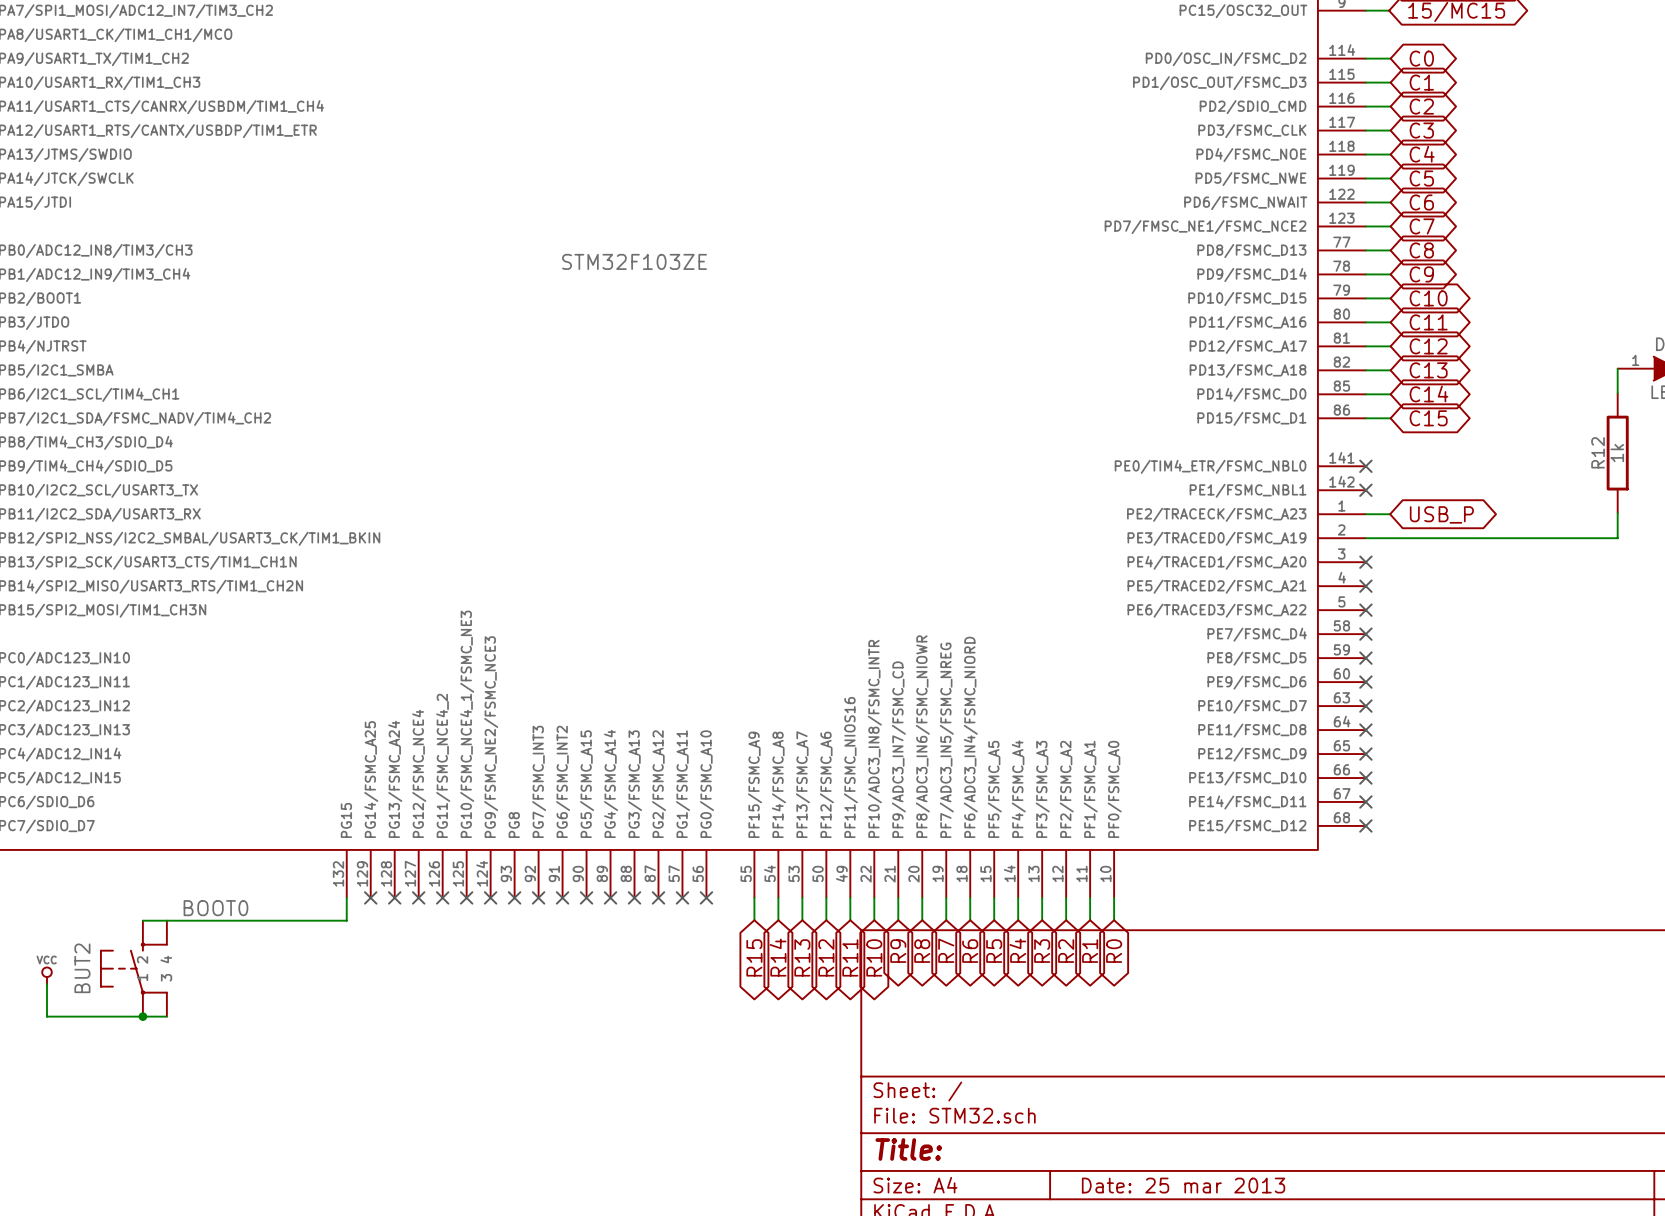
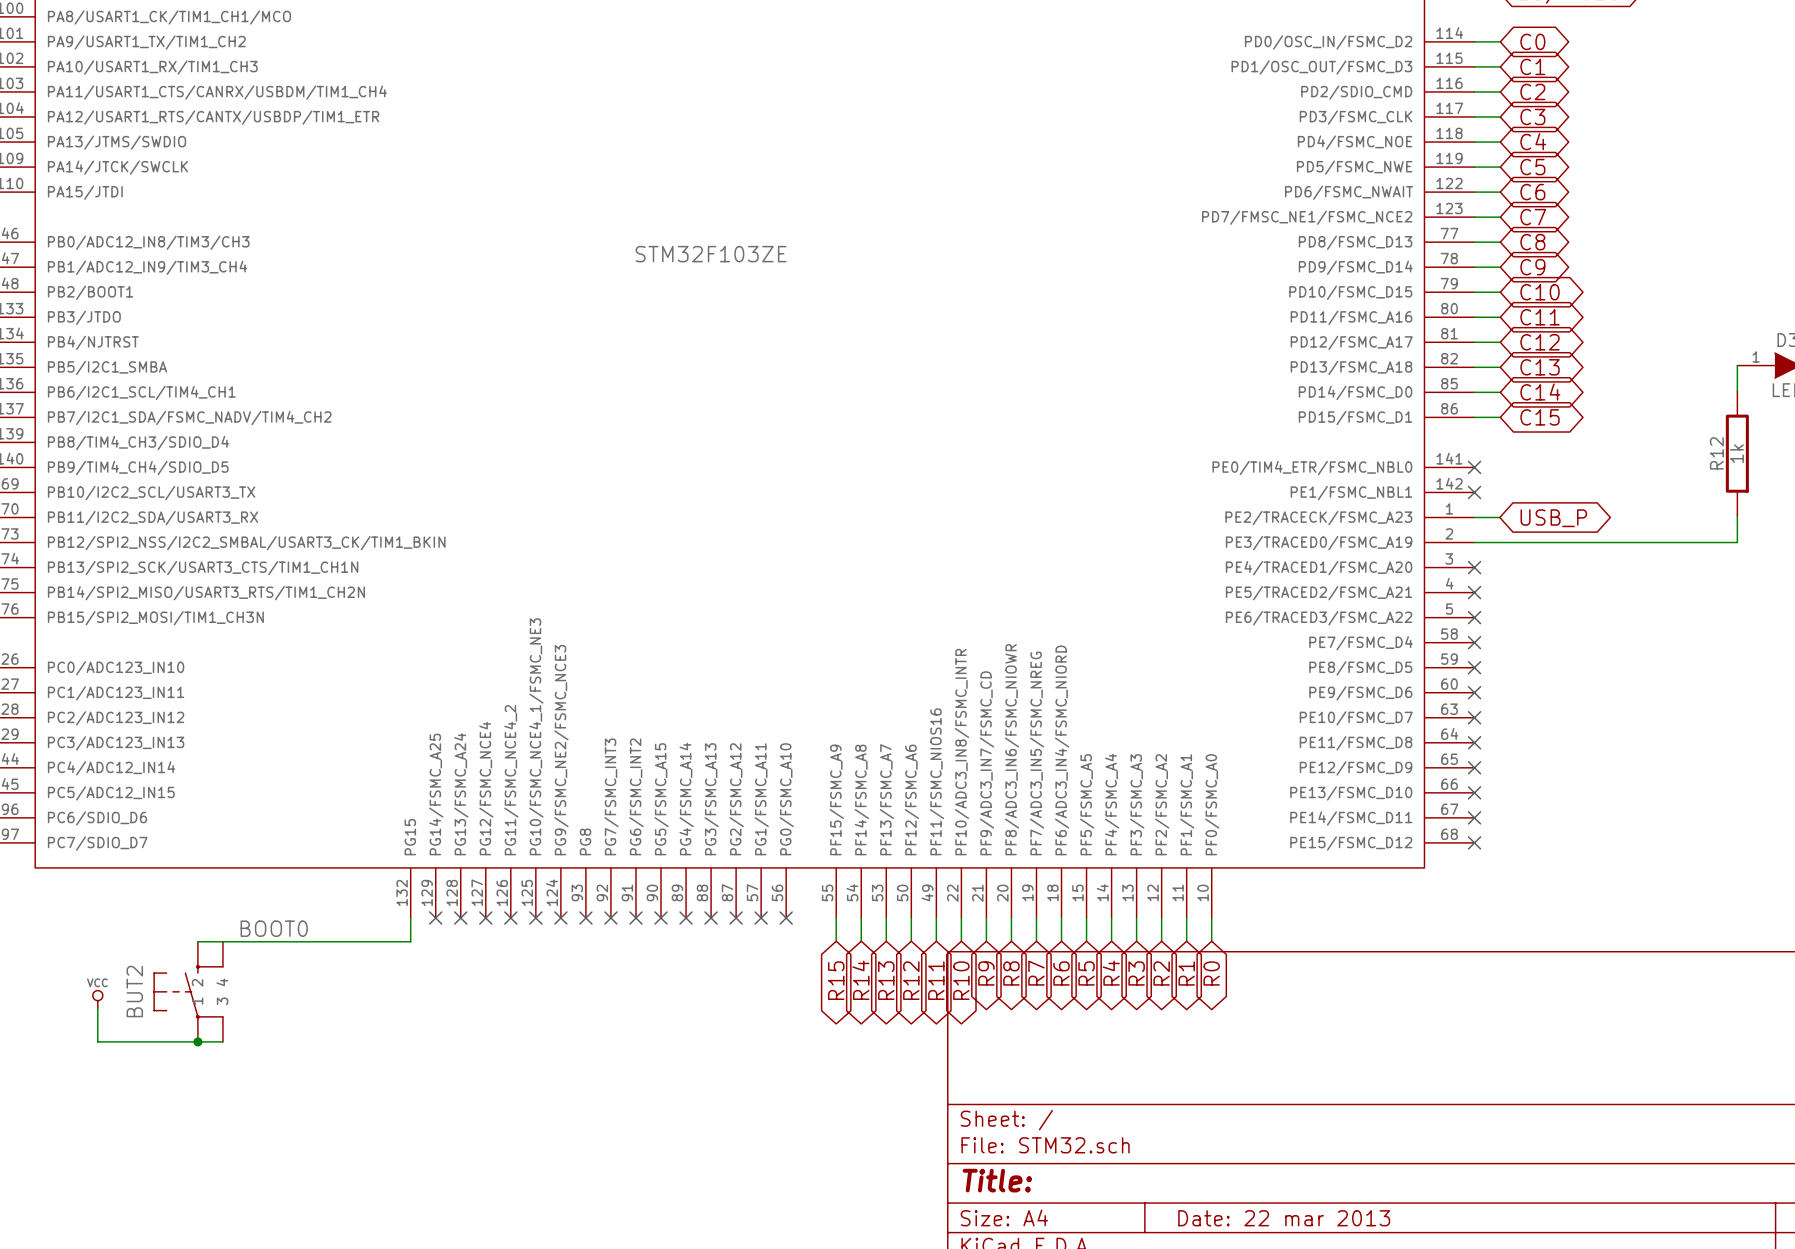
title block: Date: 25 mar 2013 (1183, 1185) -> Date: 22 mar 2013 (1284, 1218)

